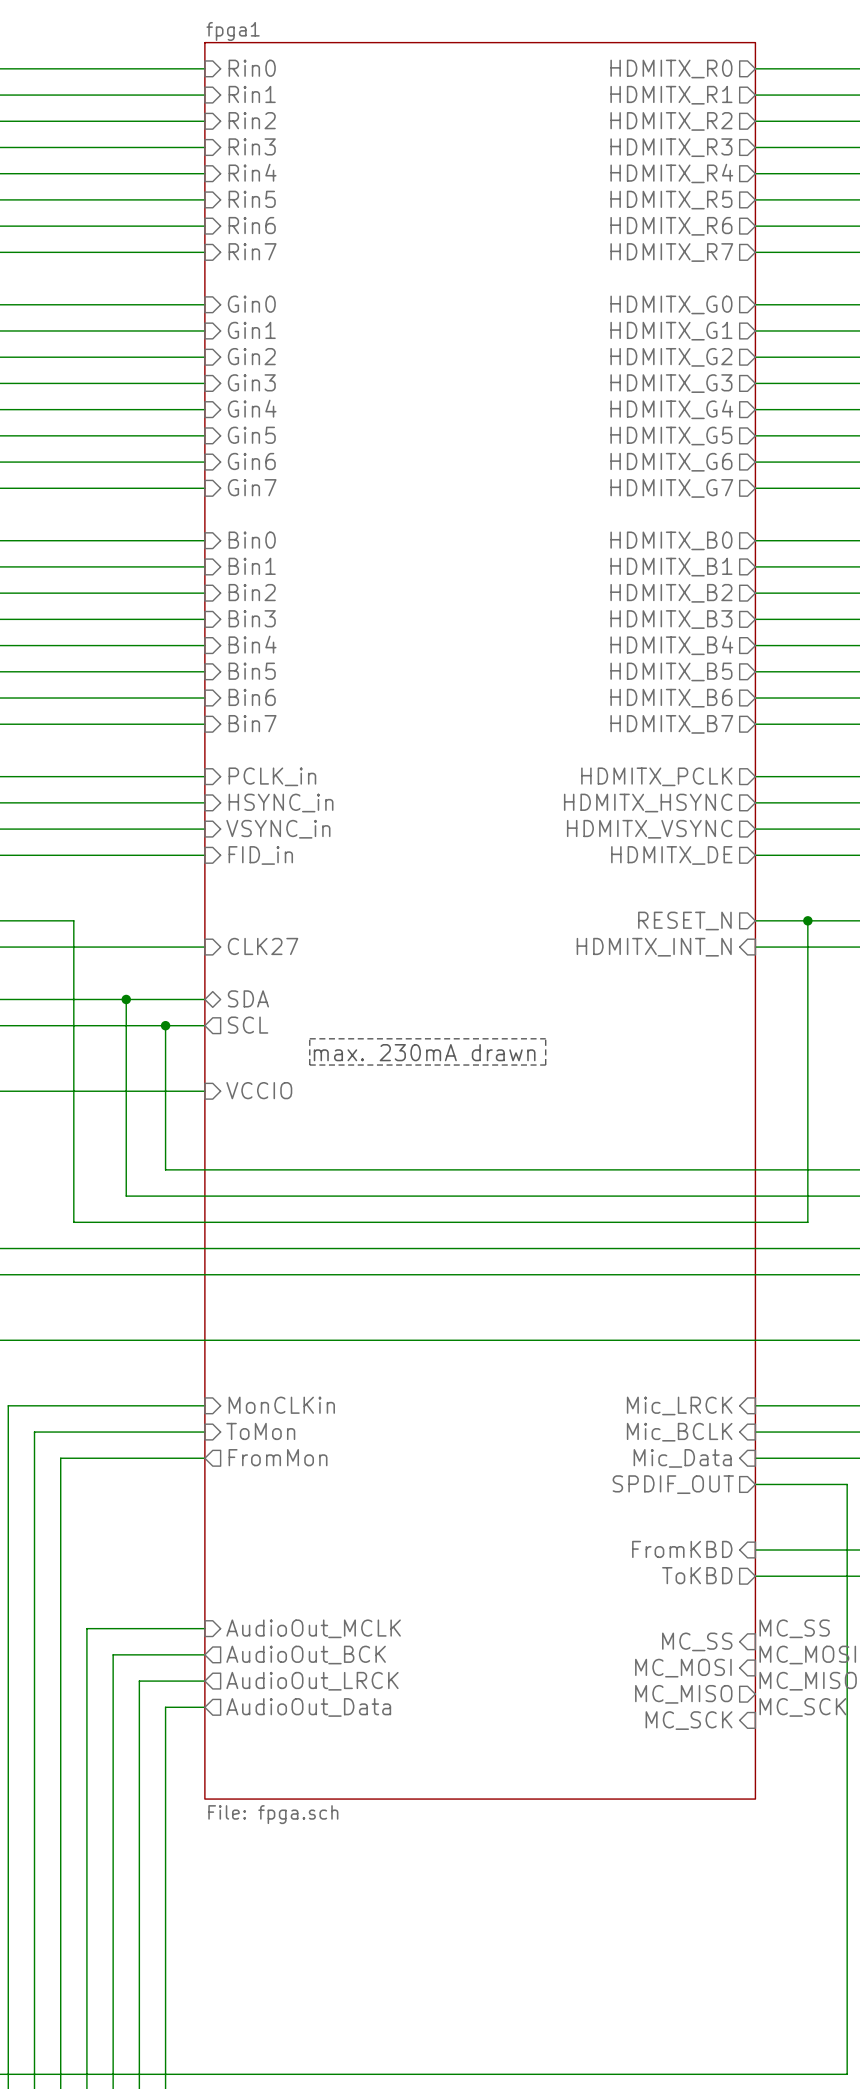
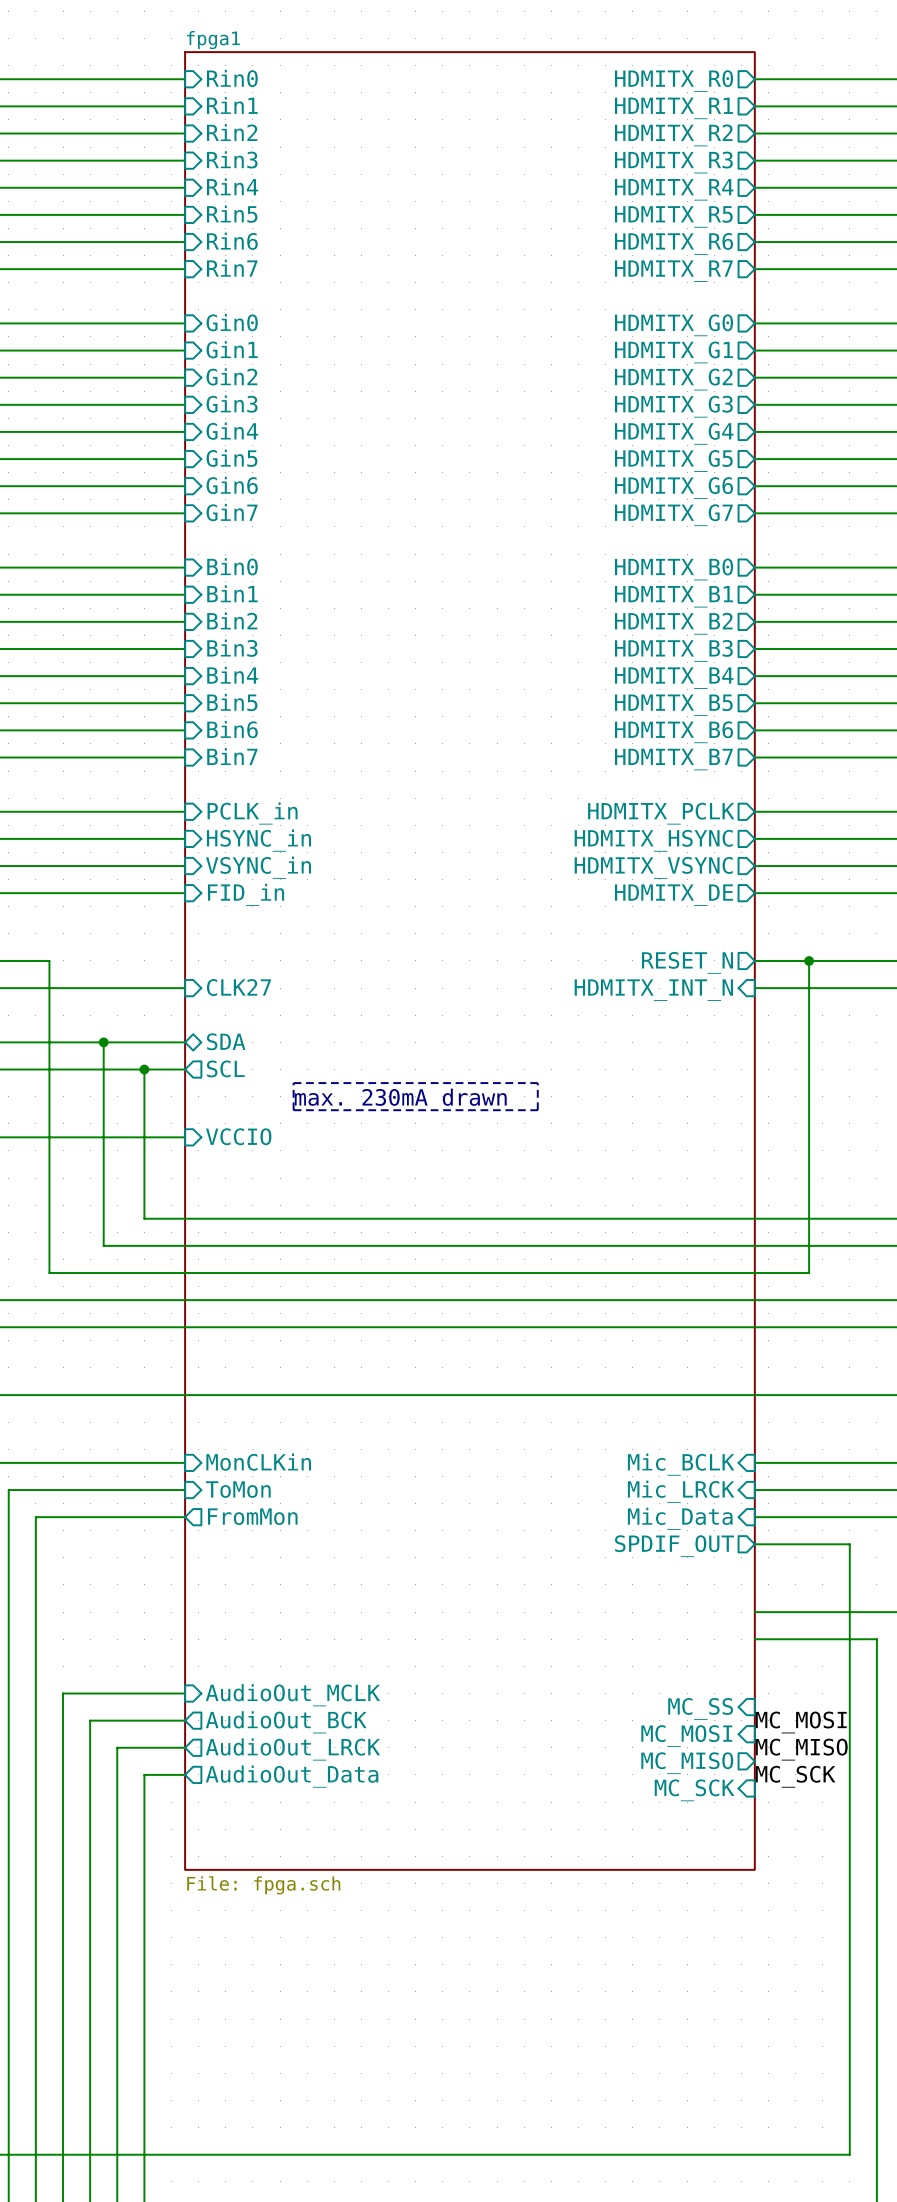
sheet pin: Mic_LRCK (679, 1405) -> Mic_BCLK (681, 1464)
sheet pin: Mic_BCLK (679, 1432) -> Mic_LRCK (681, 1491)
sheet pin: FromKBD (682, 1549) -> none
sheet pin: ToKBD (697, 1575) -> none
label: MC_SS (794, 1628) -> none

